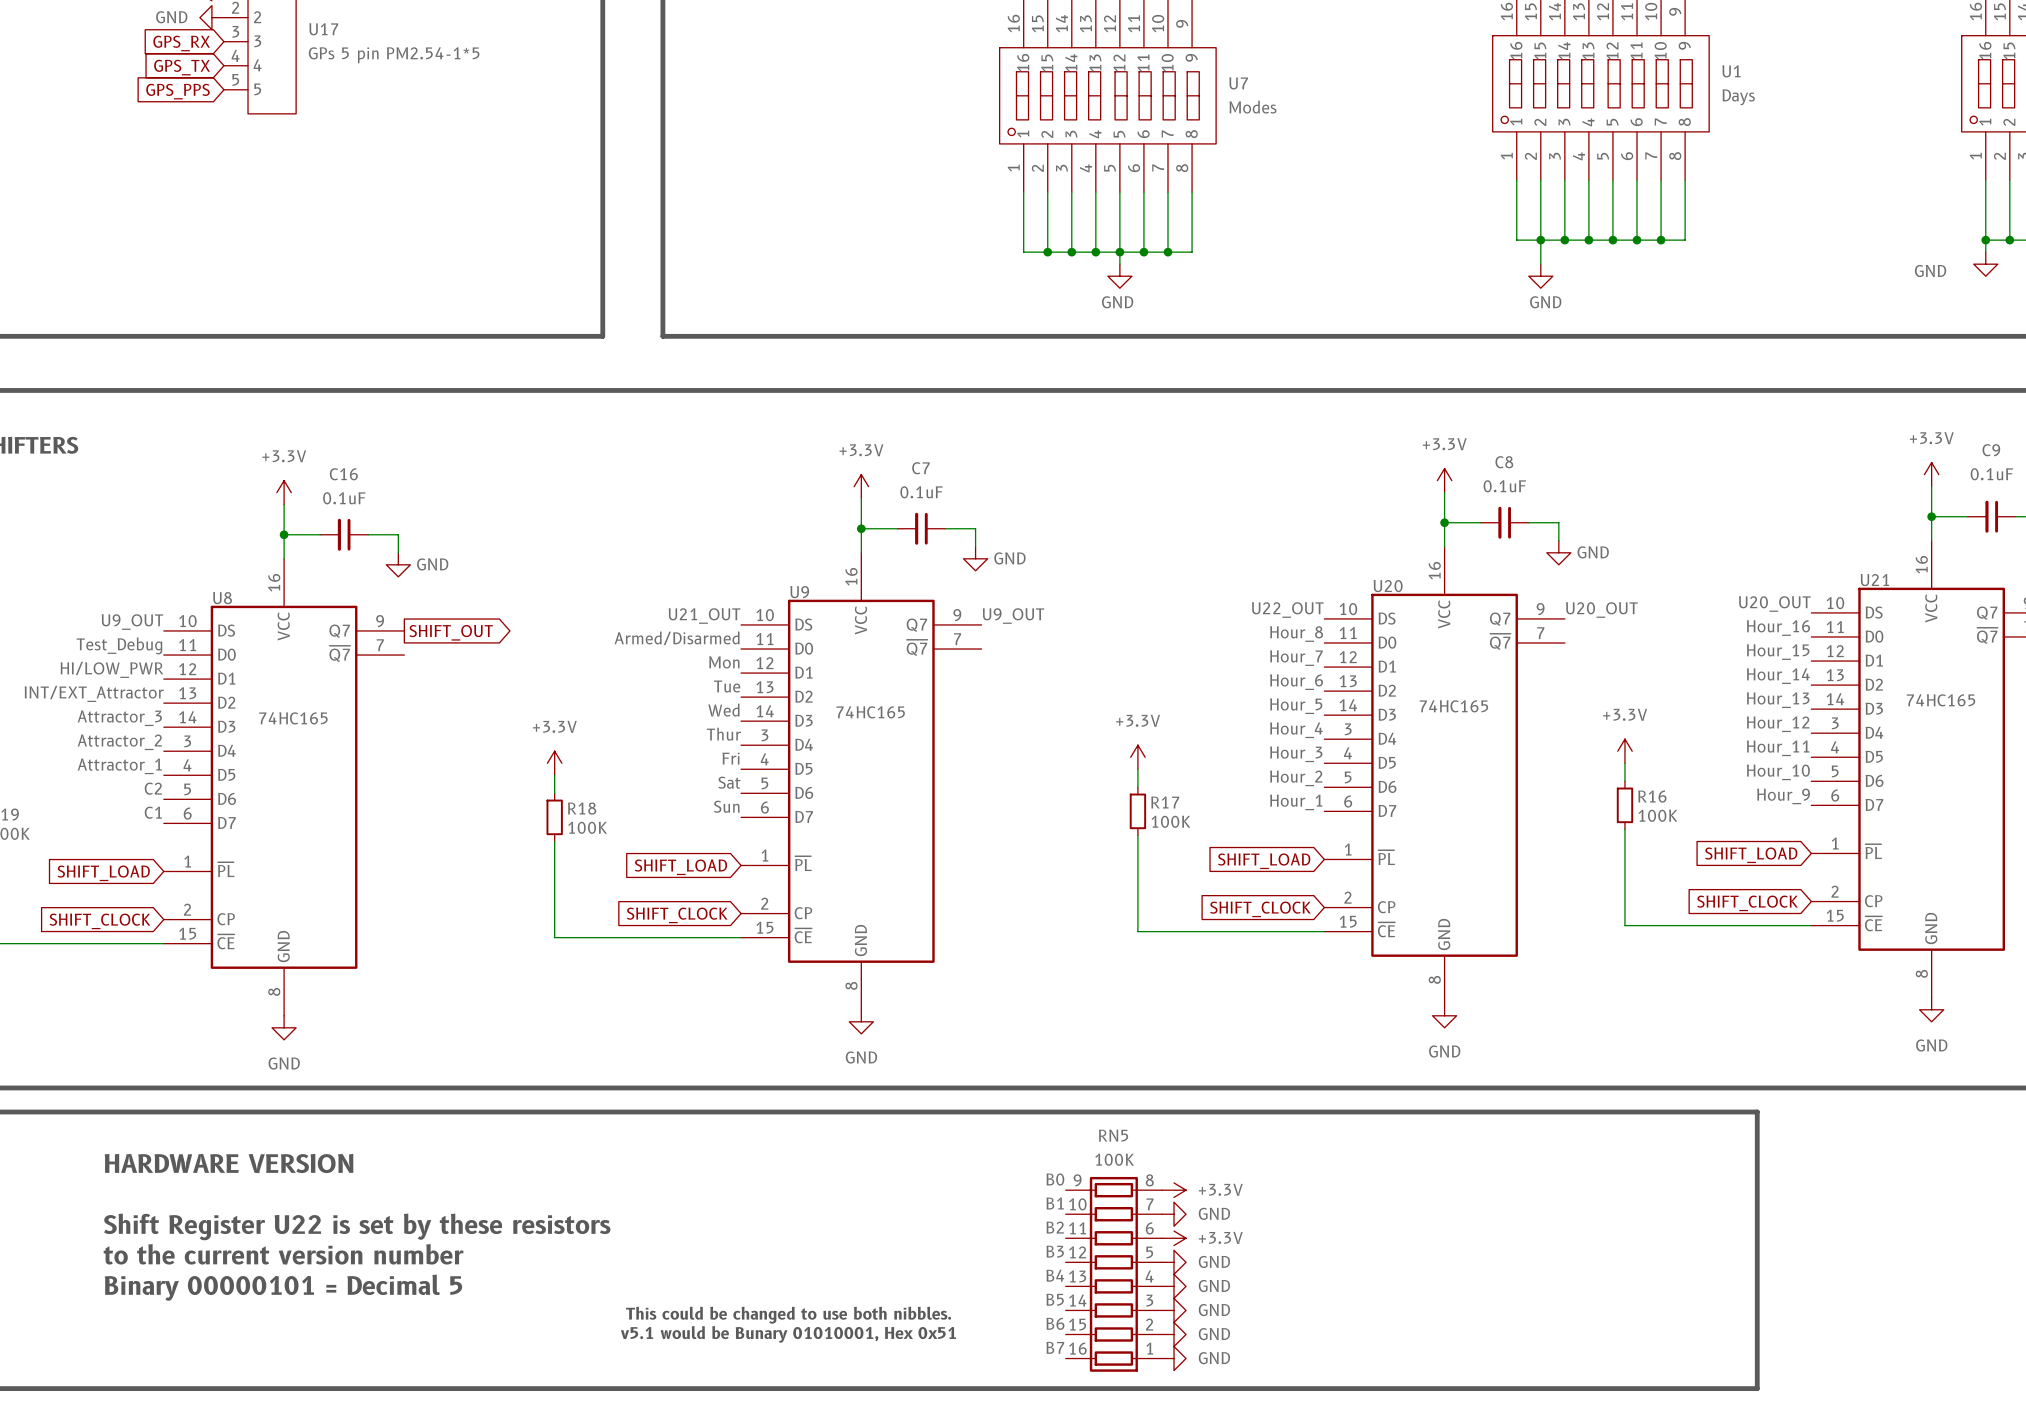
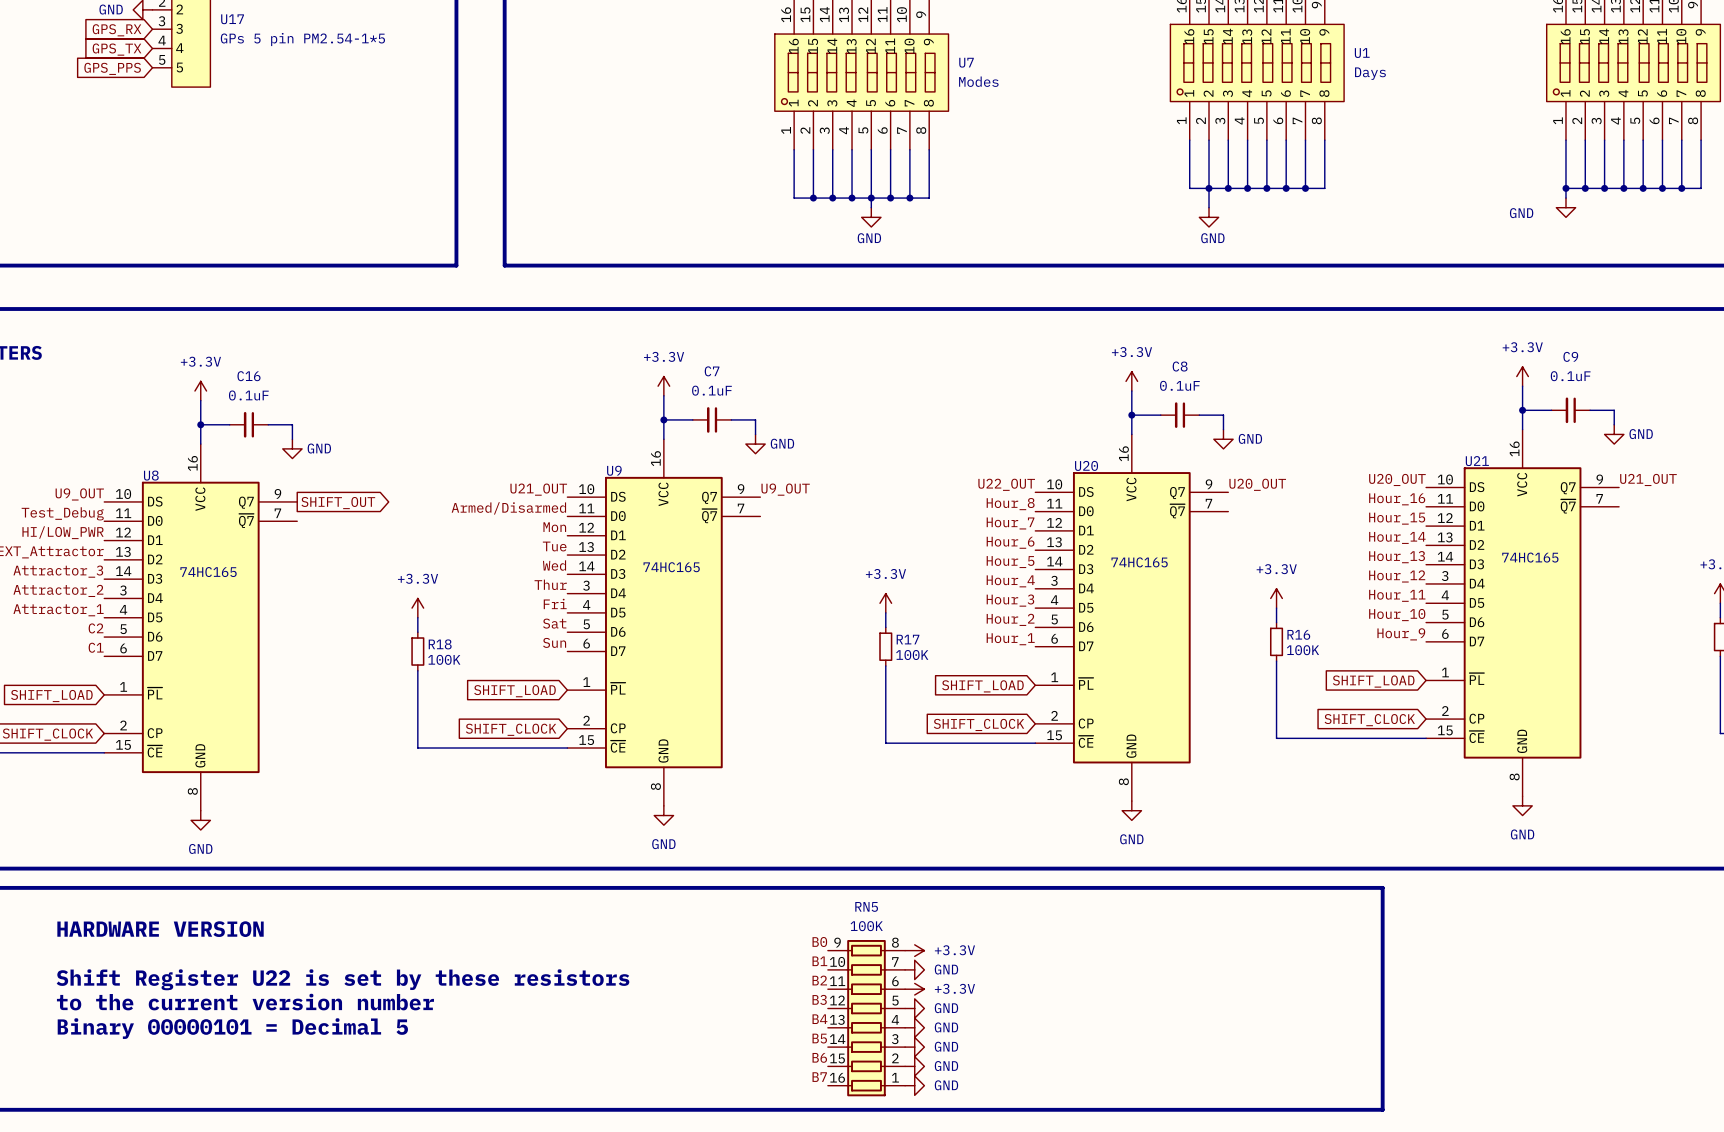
text: This could be changed to use both nibbles. (788, 1315) -> none
text: v5.1 would be Bunary 01010001, Hex 0x51 (788, 1334) -> none

